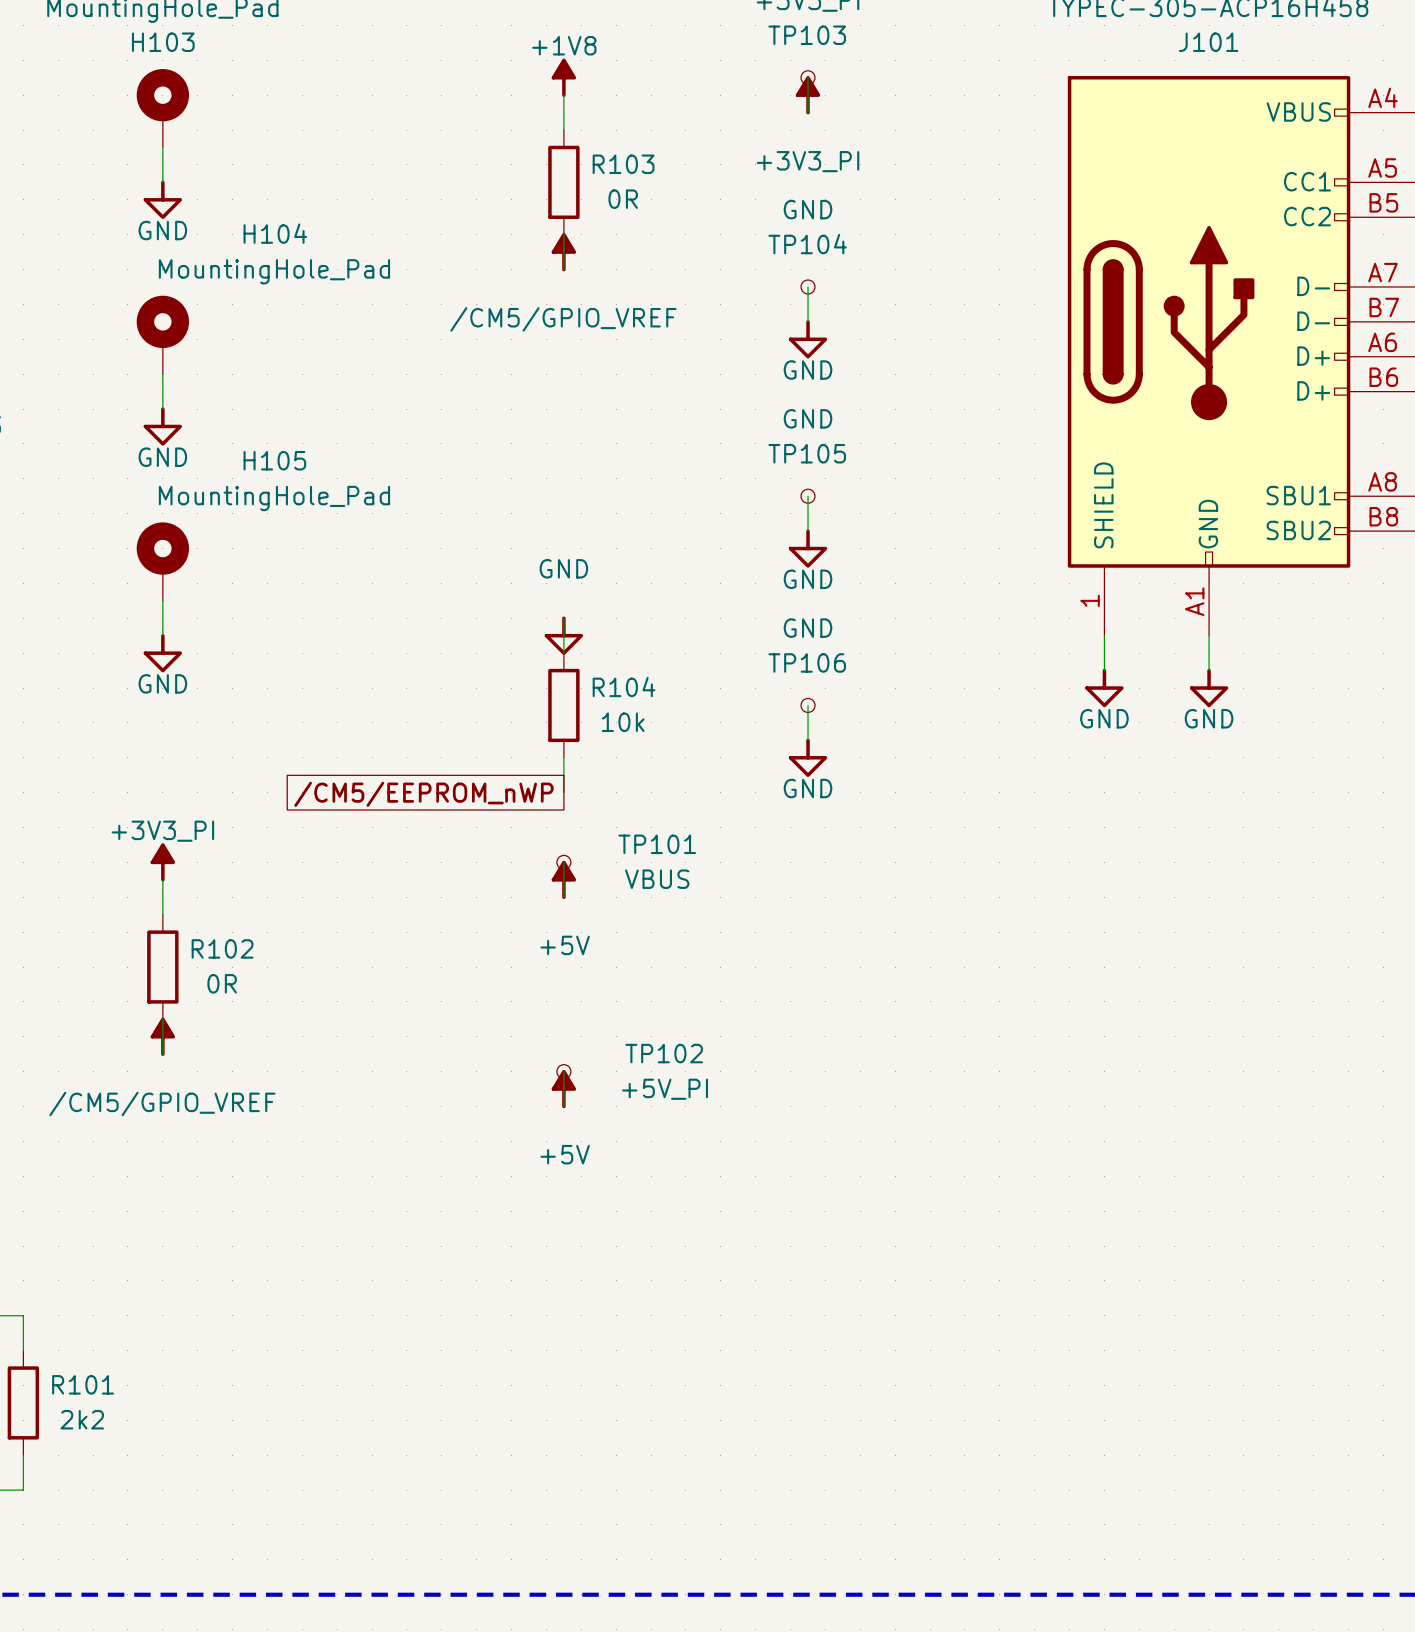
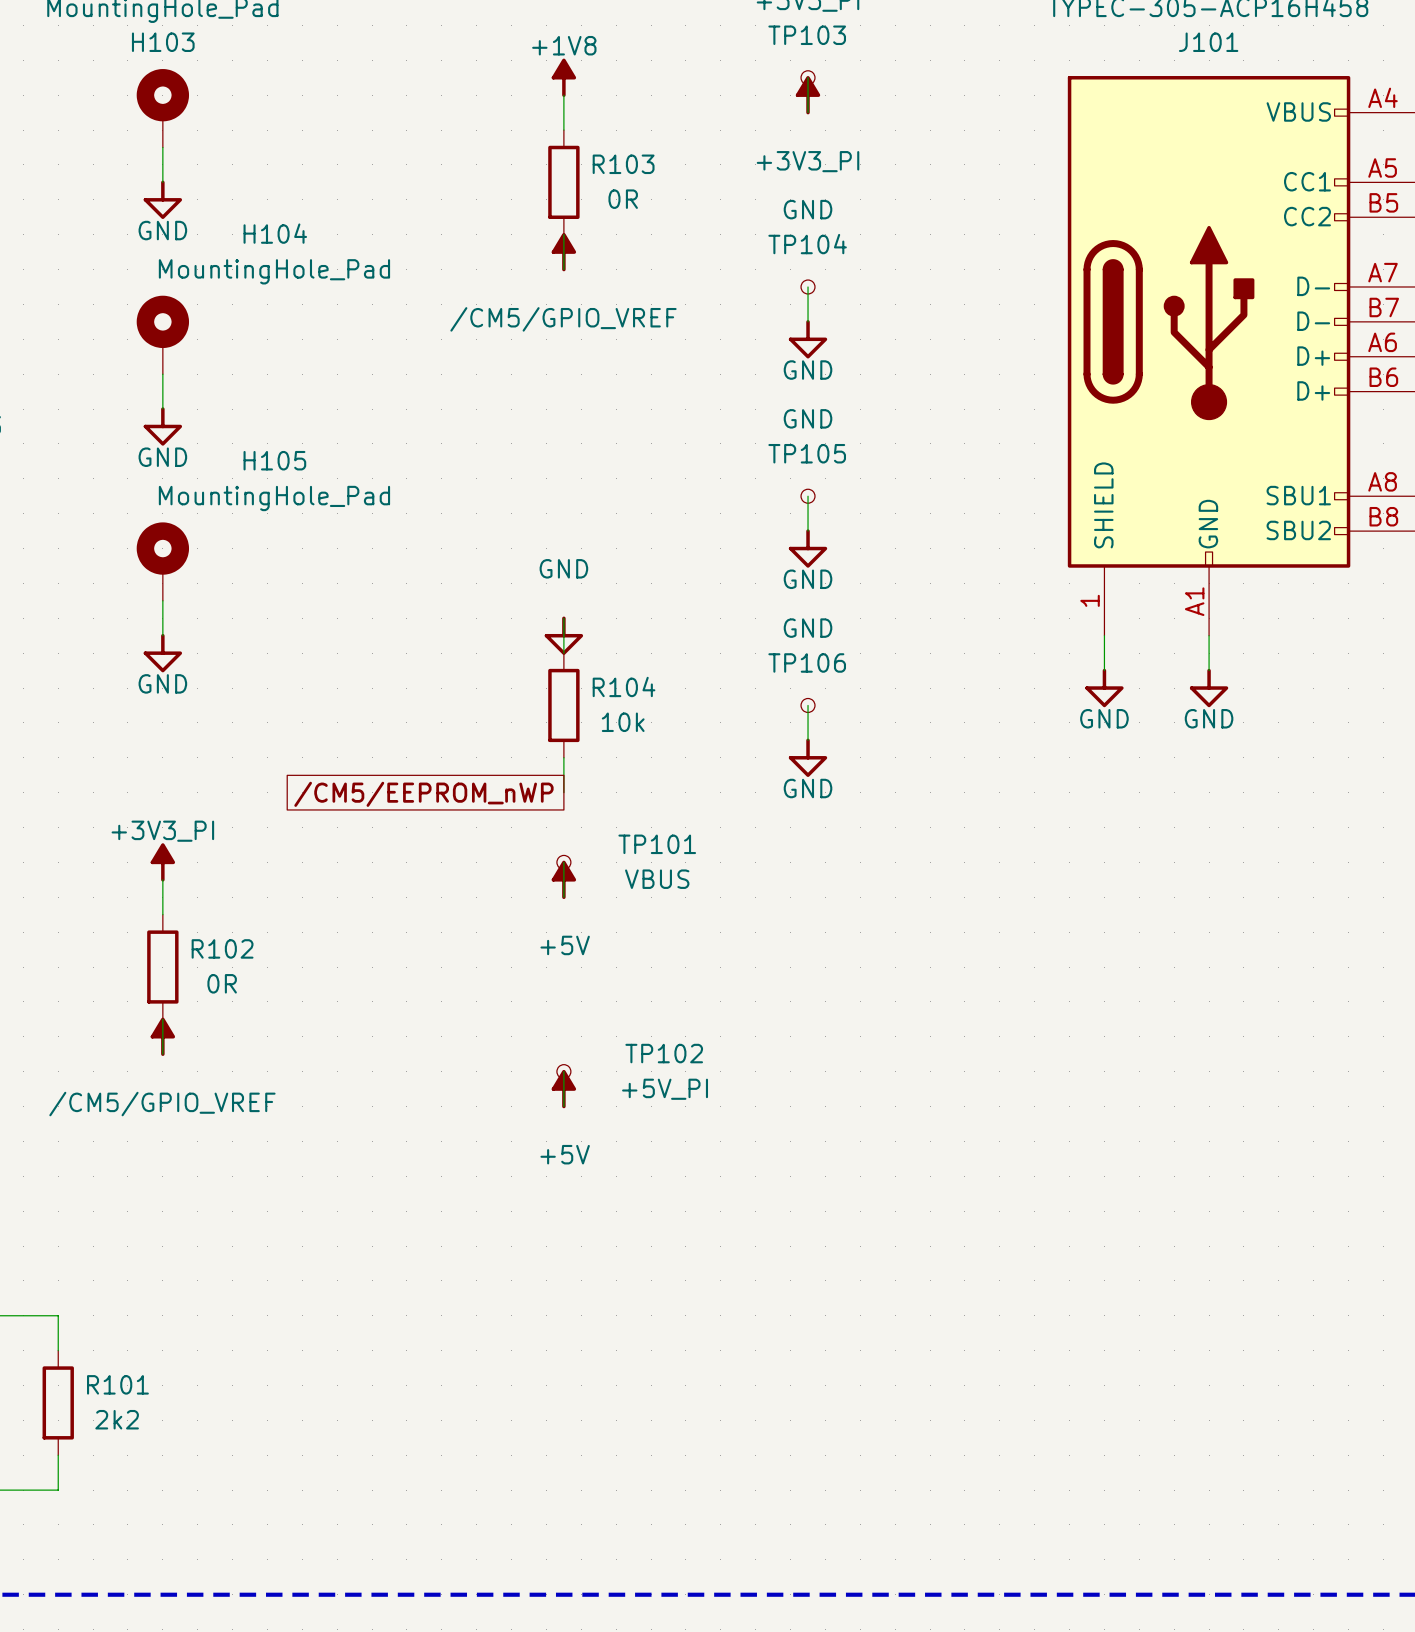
wire: (23, 1315) (23, 1350) -> (23, 1315) (58, 1315) (58, 1350)
R101 position: (23, 1402) -> (58, 1402)
wire: (23, 1455) (23, 1490) -> (58, 1455) (58, 1490) (23, 1490)

